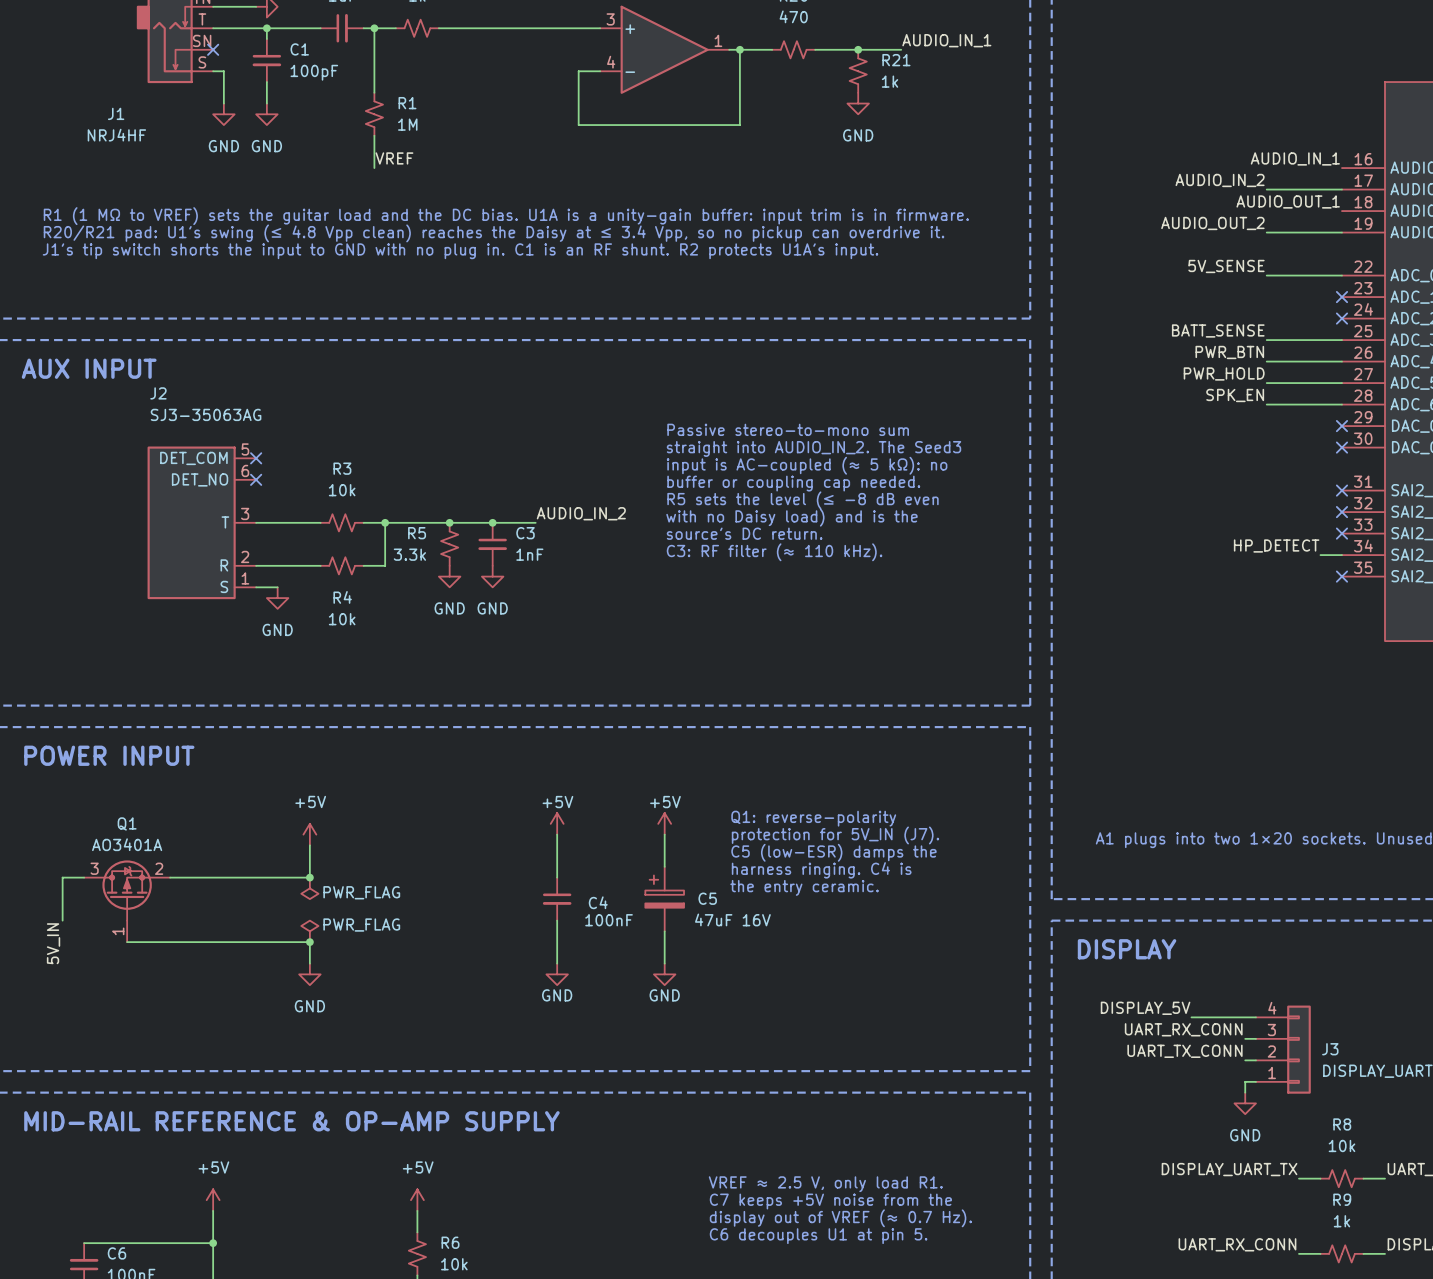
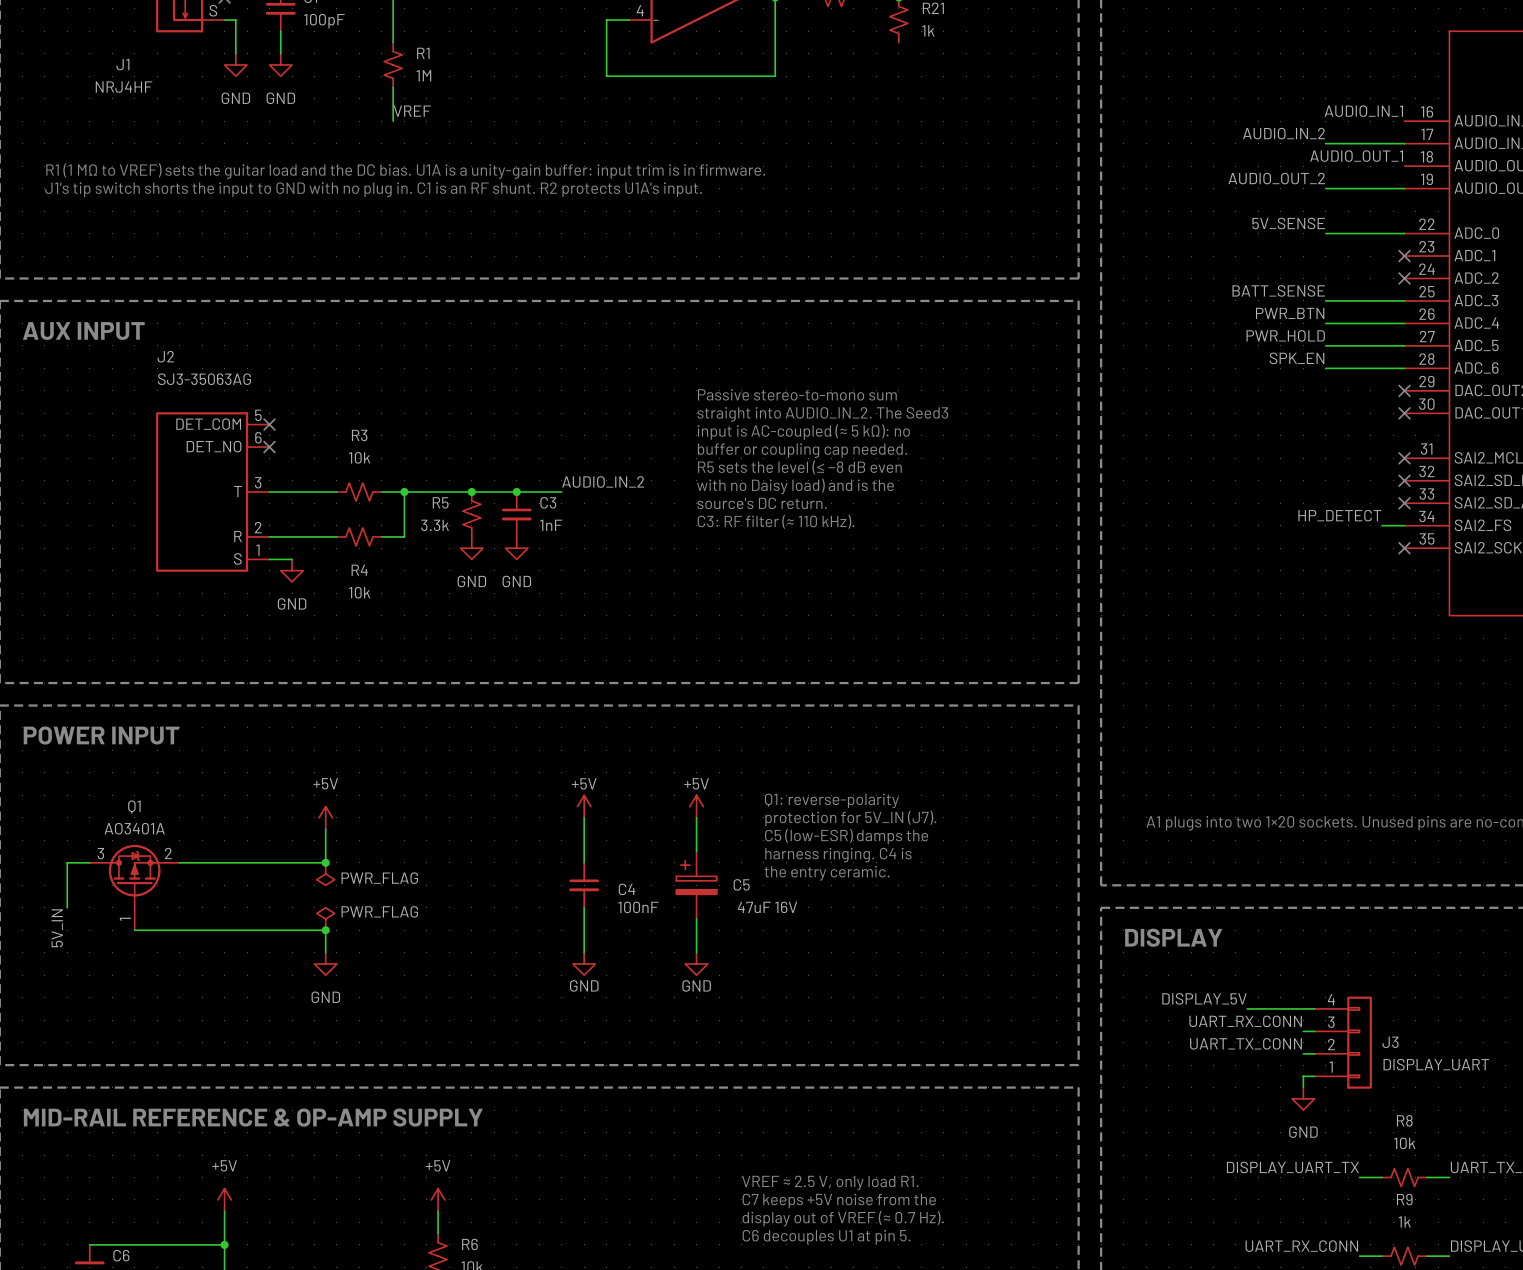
power symbol: GND (858, 103) -> none
text: R20/R21 pad: U1's swing (≤ 4.8 Vpp clean) reaches the Daisy at ≤ 3.4 Vpp, so no pickup can overdrive it. (494, 233) -> J1's tip switch shorts the input to GND with no plug in. C1 is an RF shunt. R2 protects U1A's input. (373, 189)
text: J1's tip switch shorts the input to GND with no plug in. C1 is an RF shunt. R2 protects U1A's input. (460, 251) -> none

